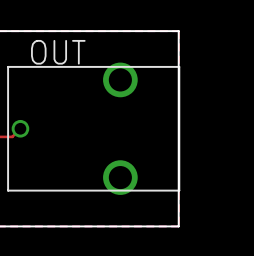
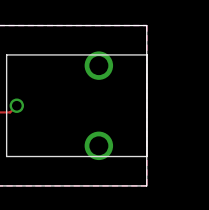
text: OUT (58, 52) -> none

